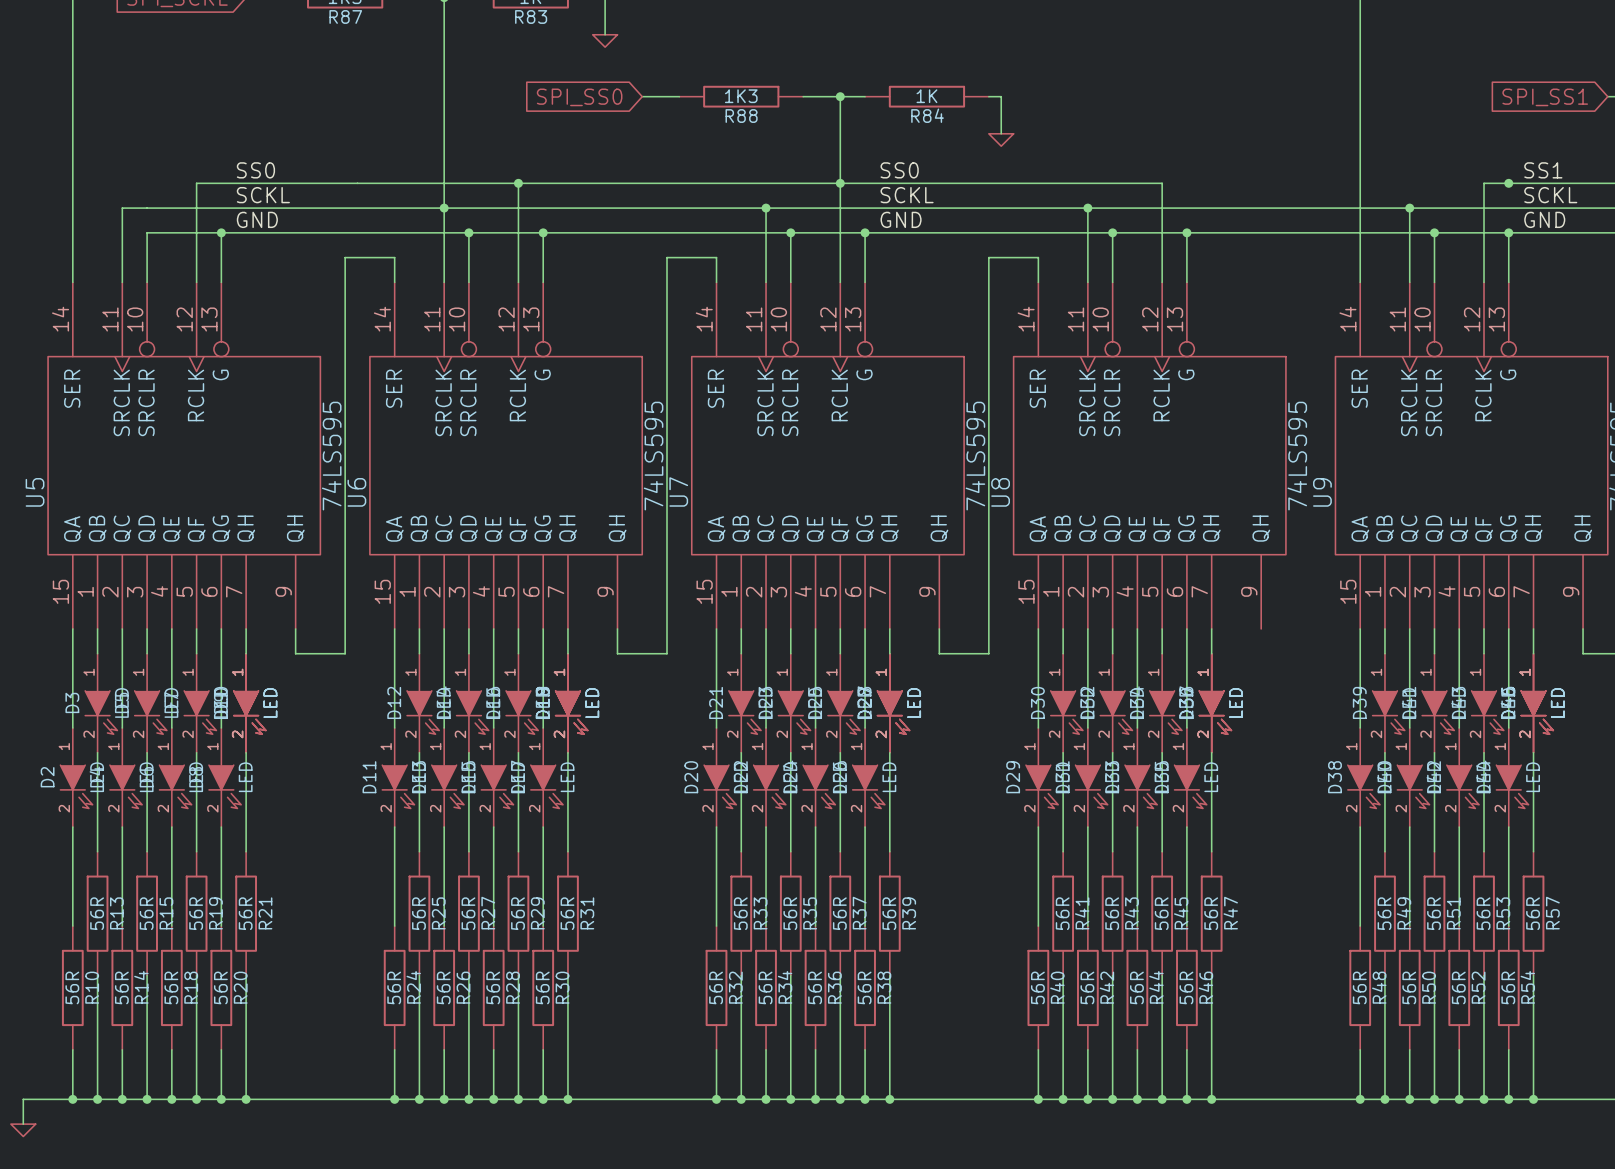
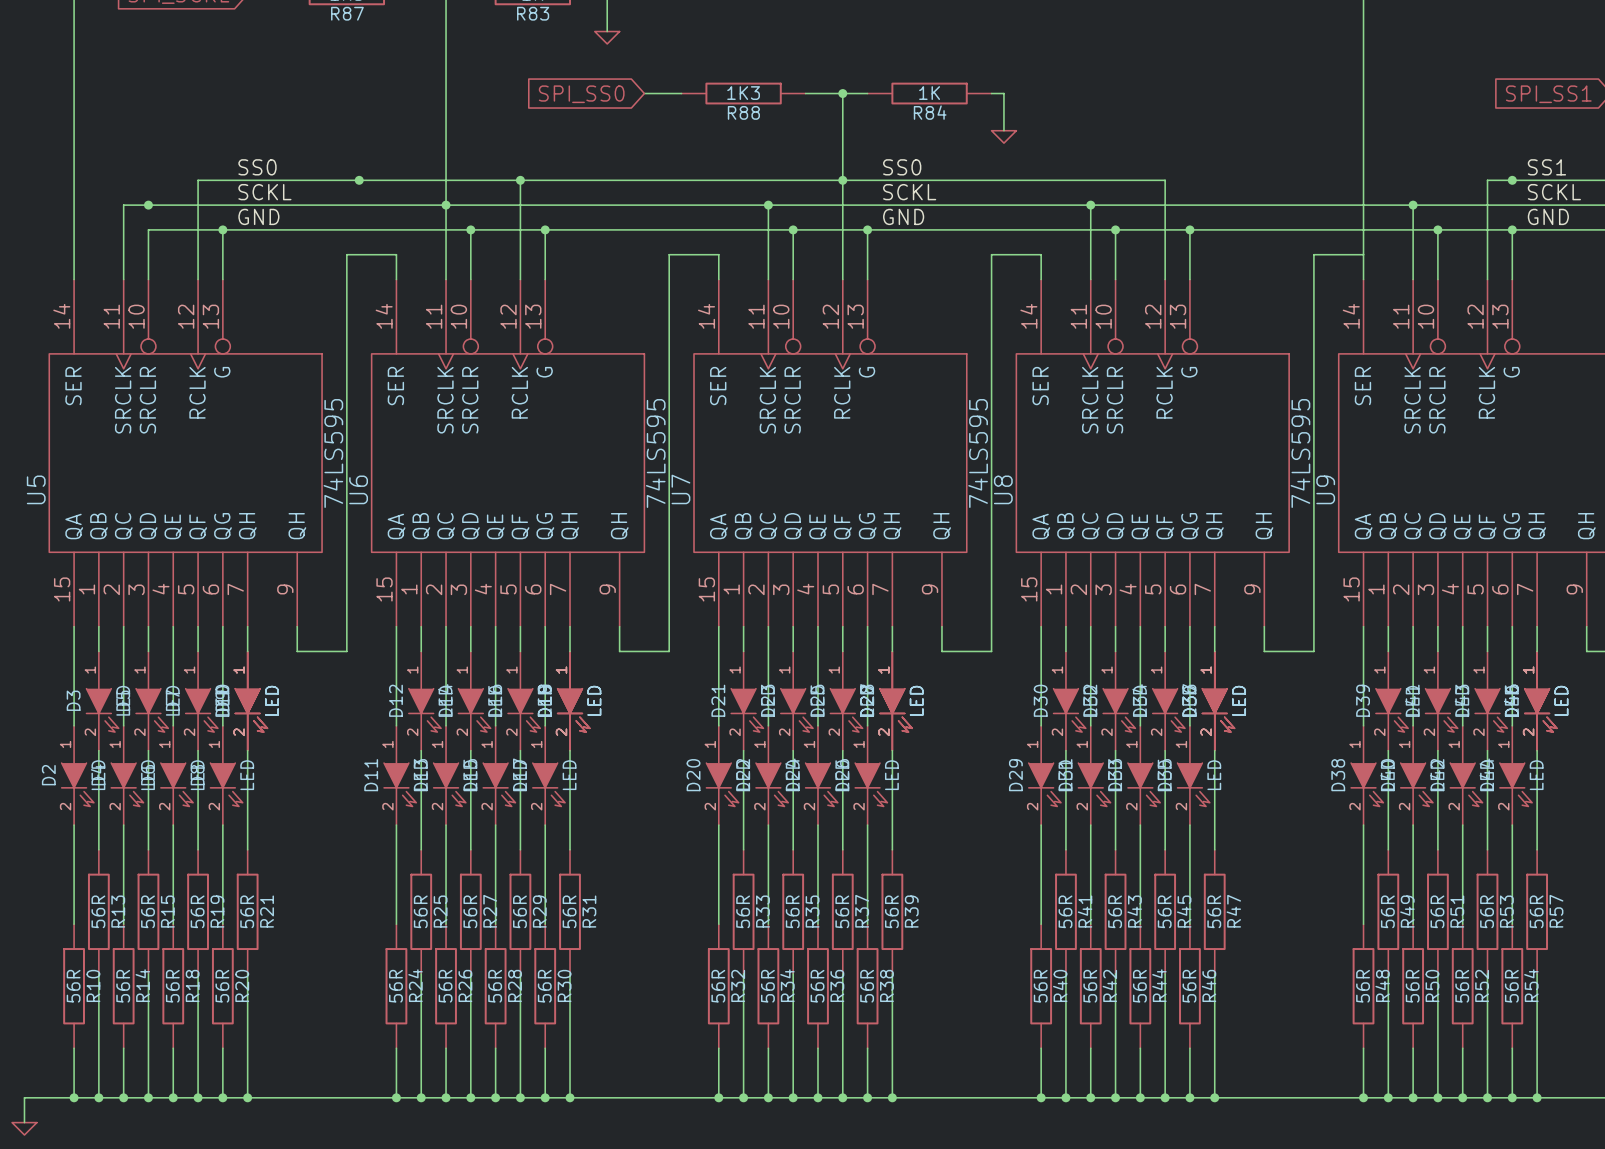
junction: none -> (359, 180)
junction: none -> (148, 205)
wire: none -> (1363, 254) (1313, 254) (1313, 651) (1264, 651) (1264, 626)

